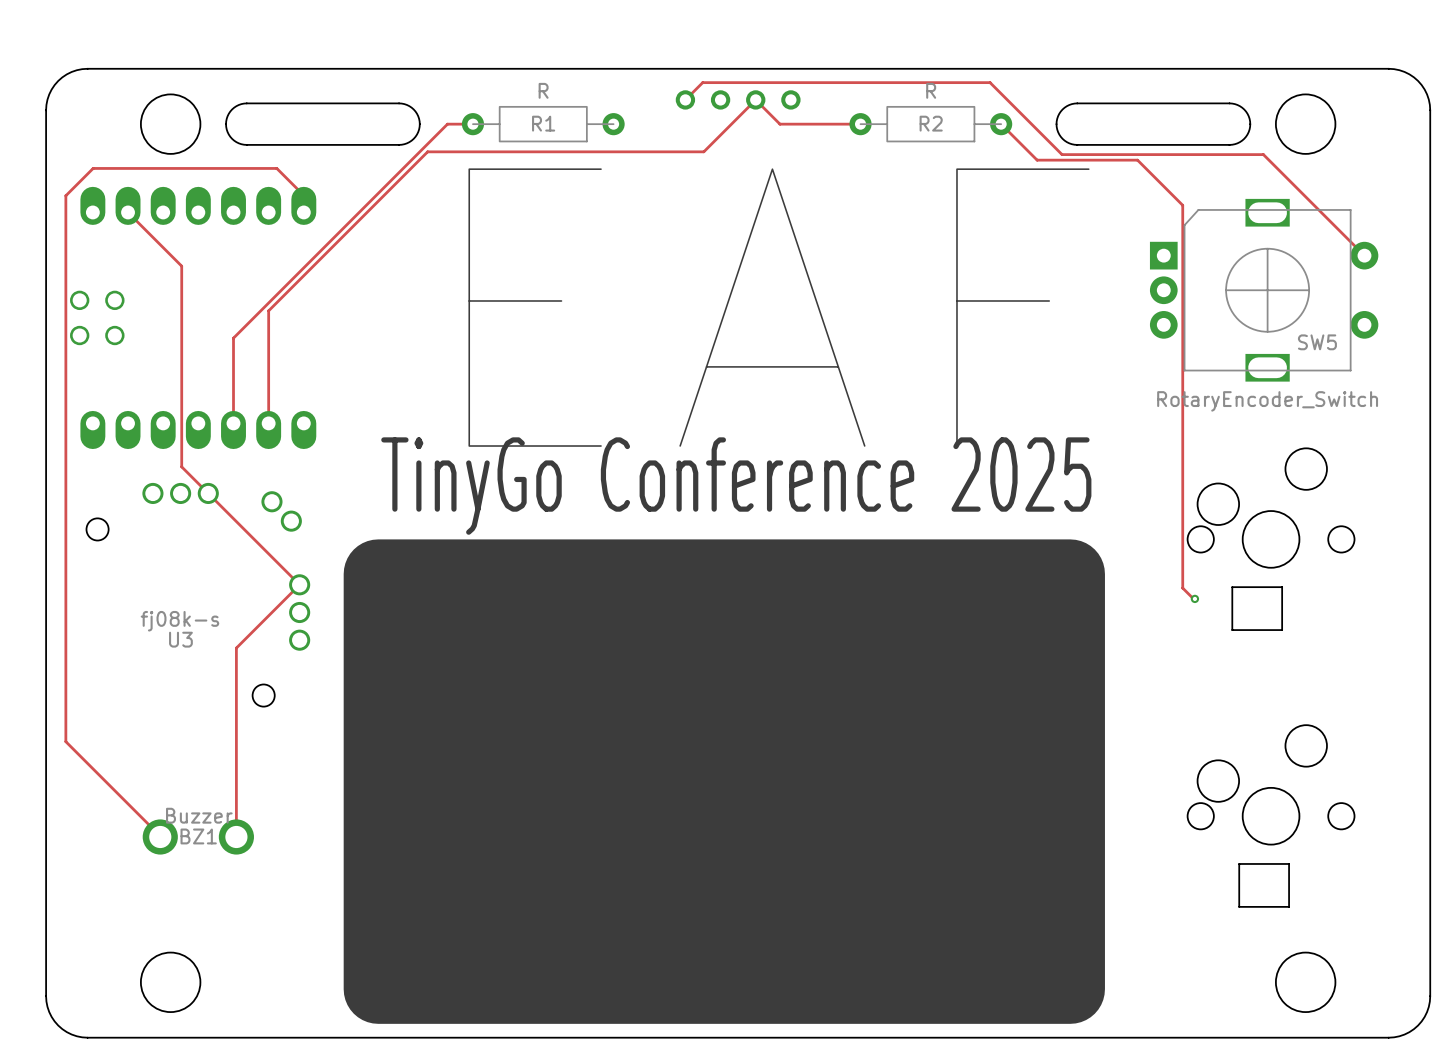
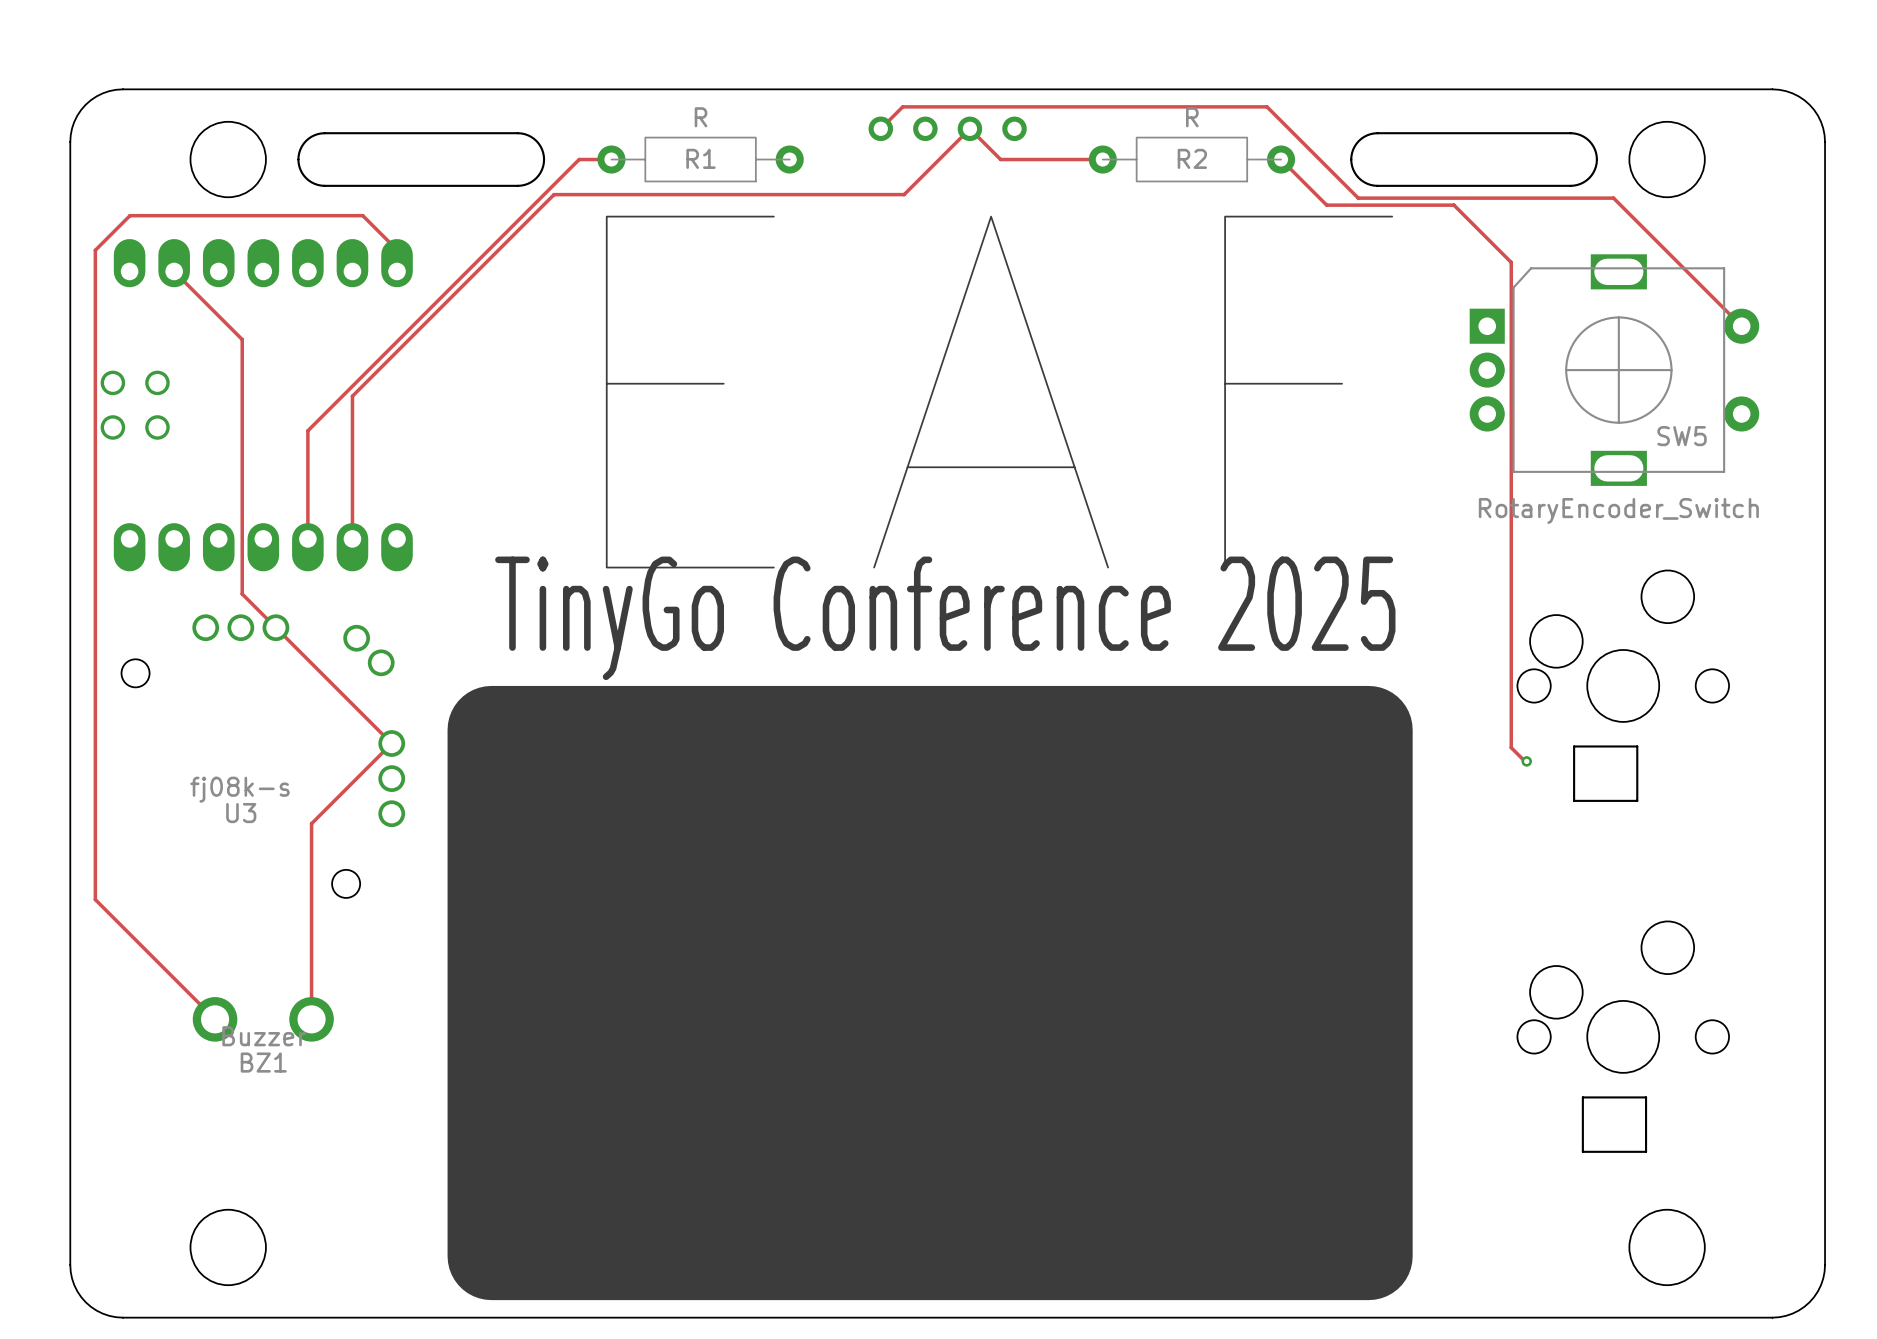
track: (65, 707) (65, 741) (160, 836) -> (95, 899) (215, 1019)
track: (236, 802) (236, 836) -> none
BZ1 position: (198, 836) -> (263, 1019)

